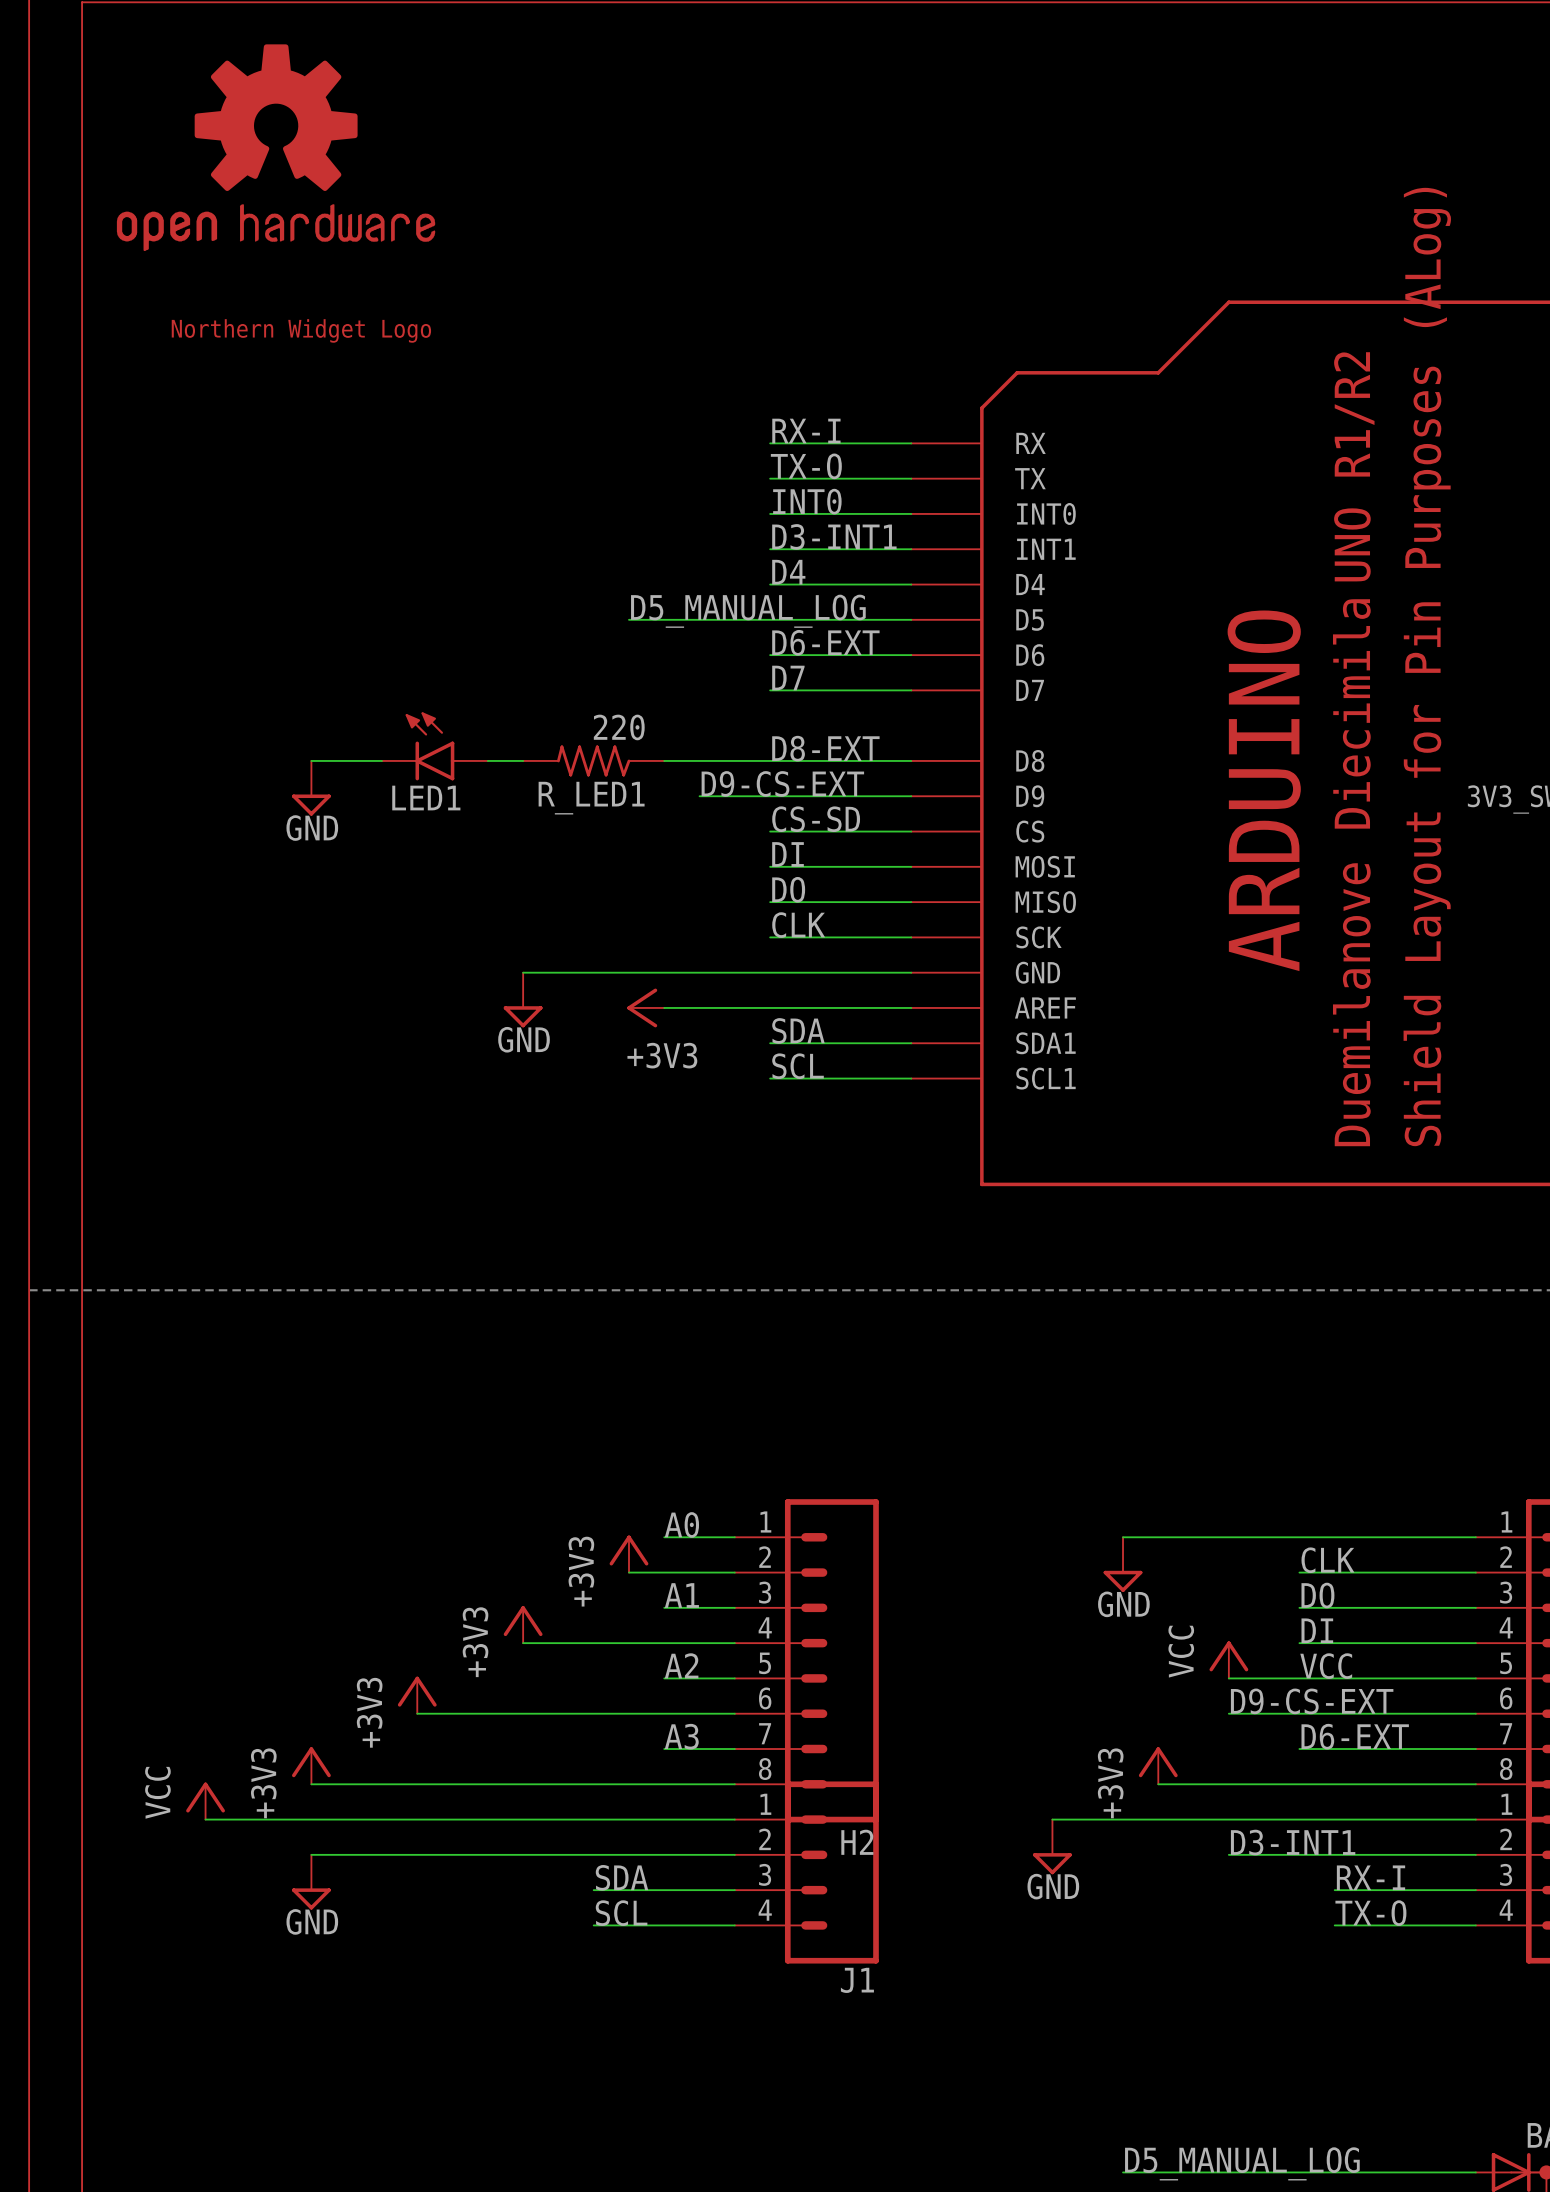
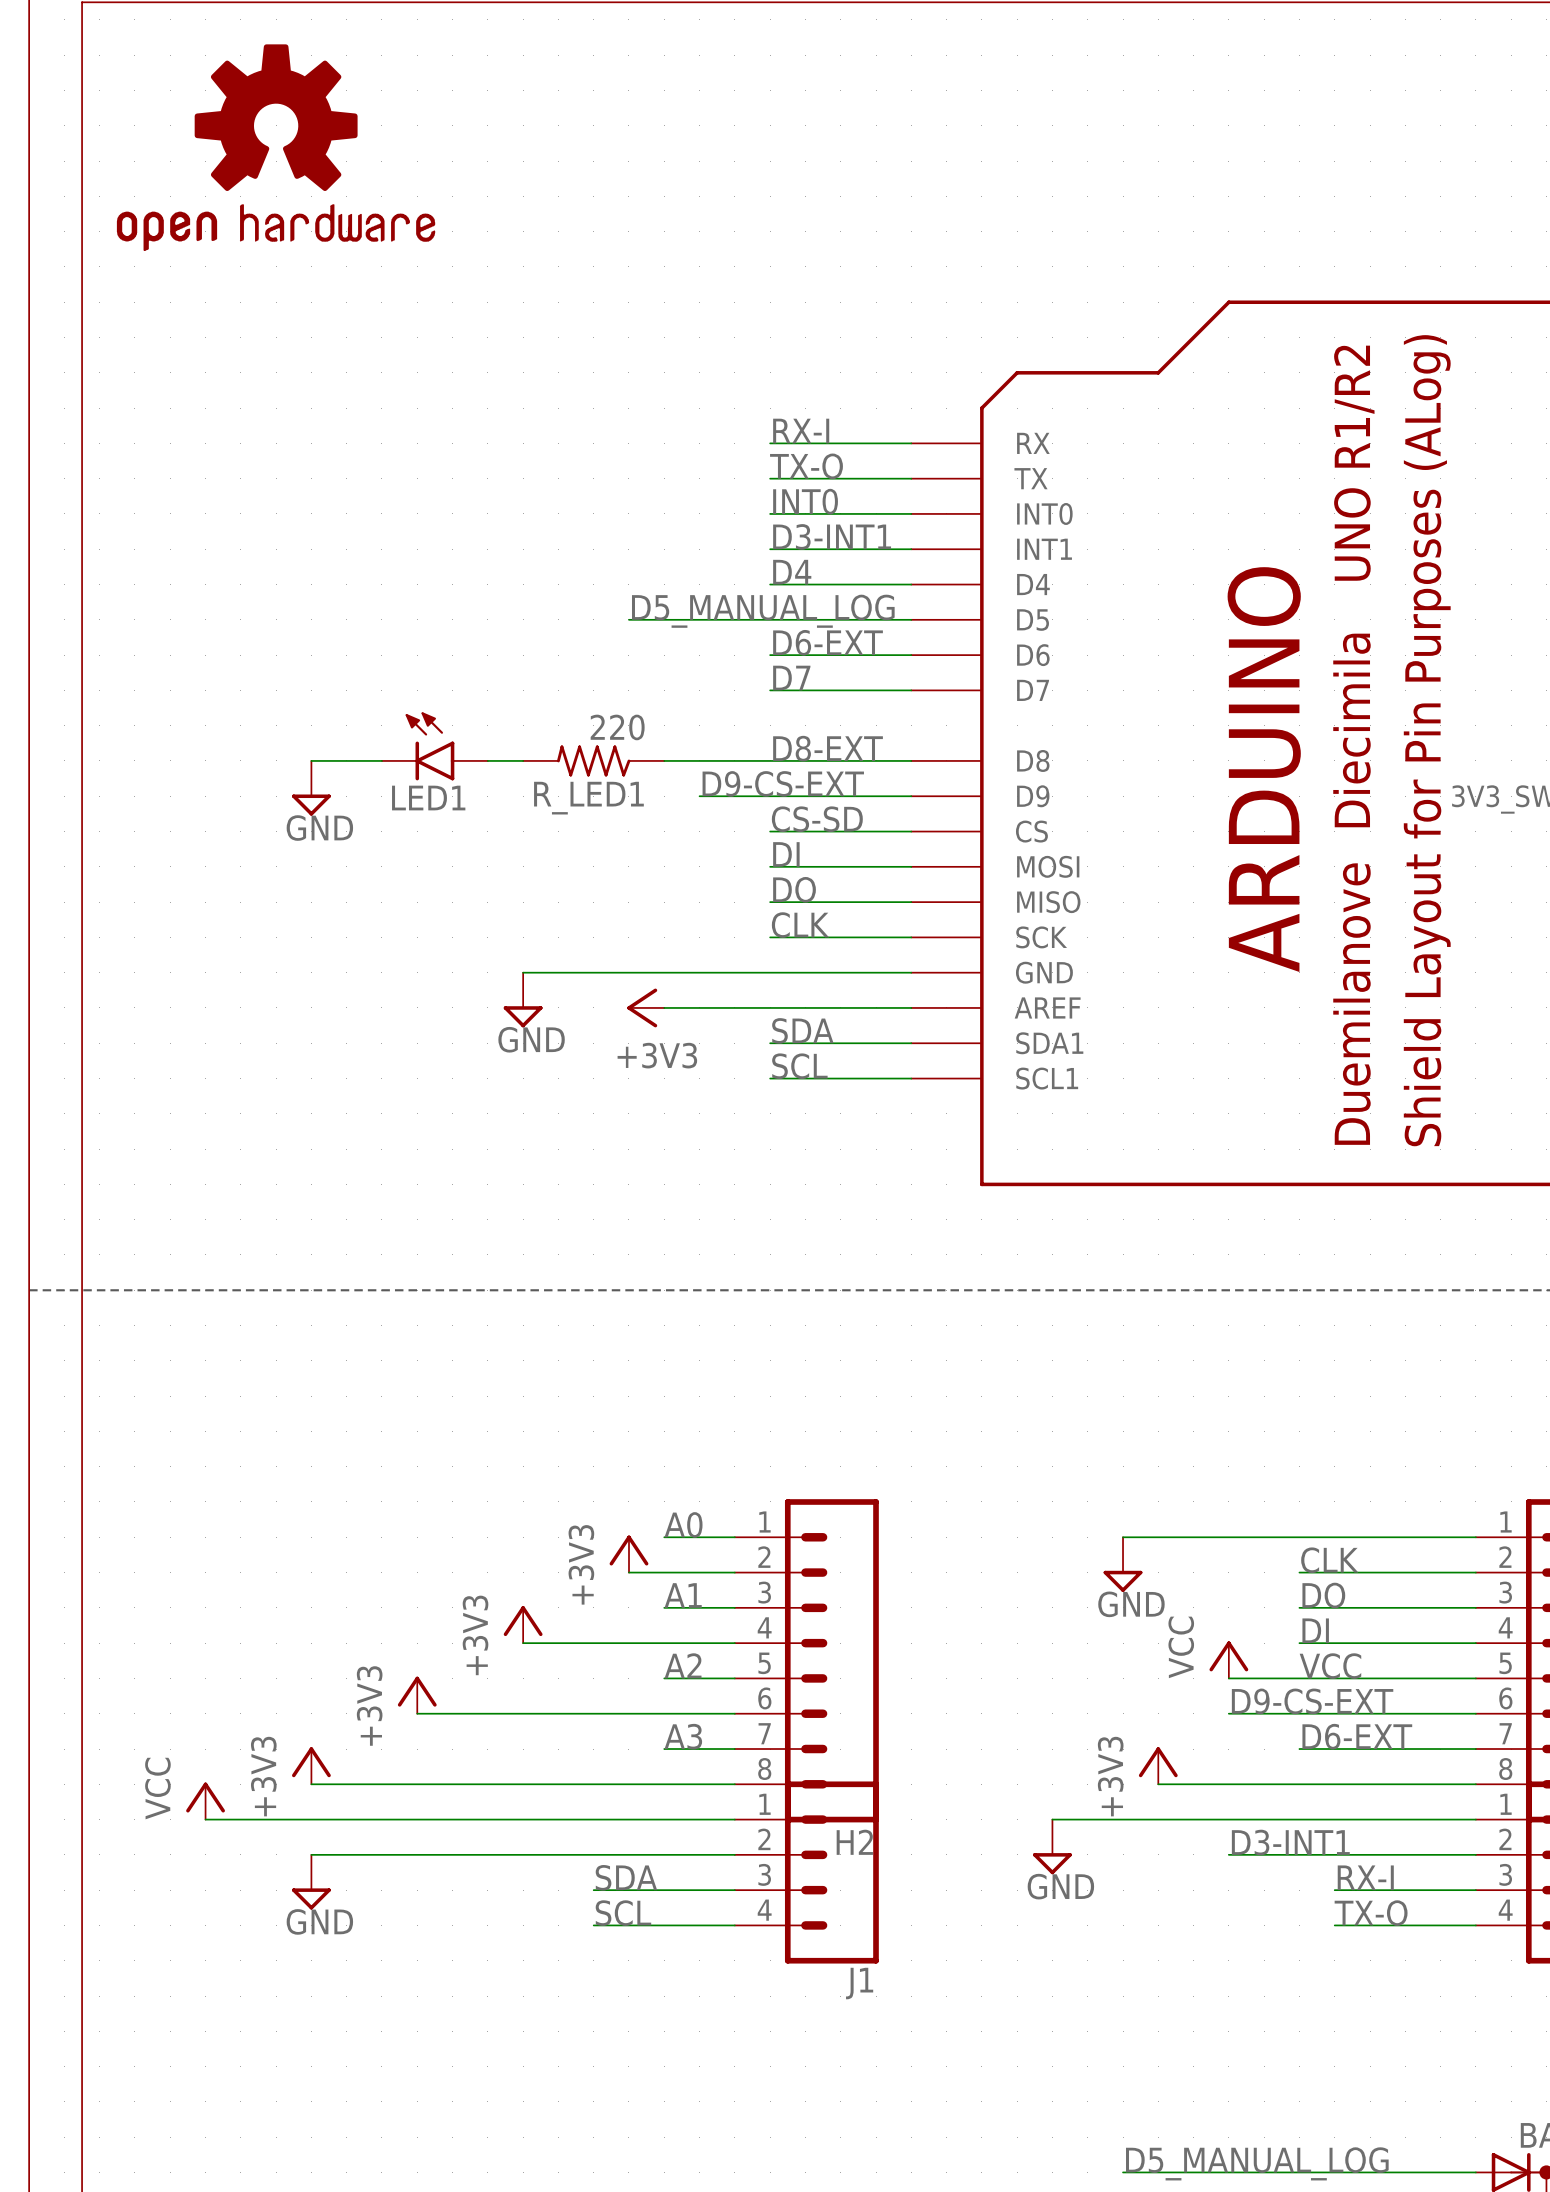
part: (301, 330) -> none

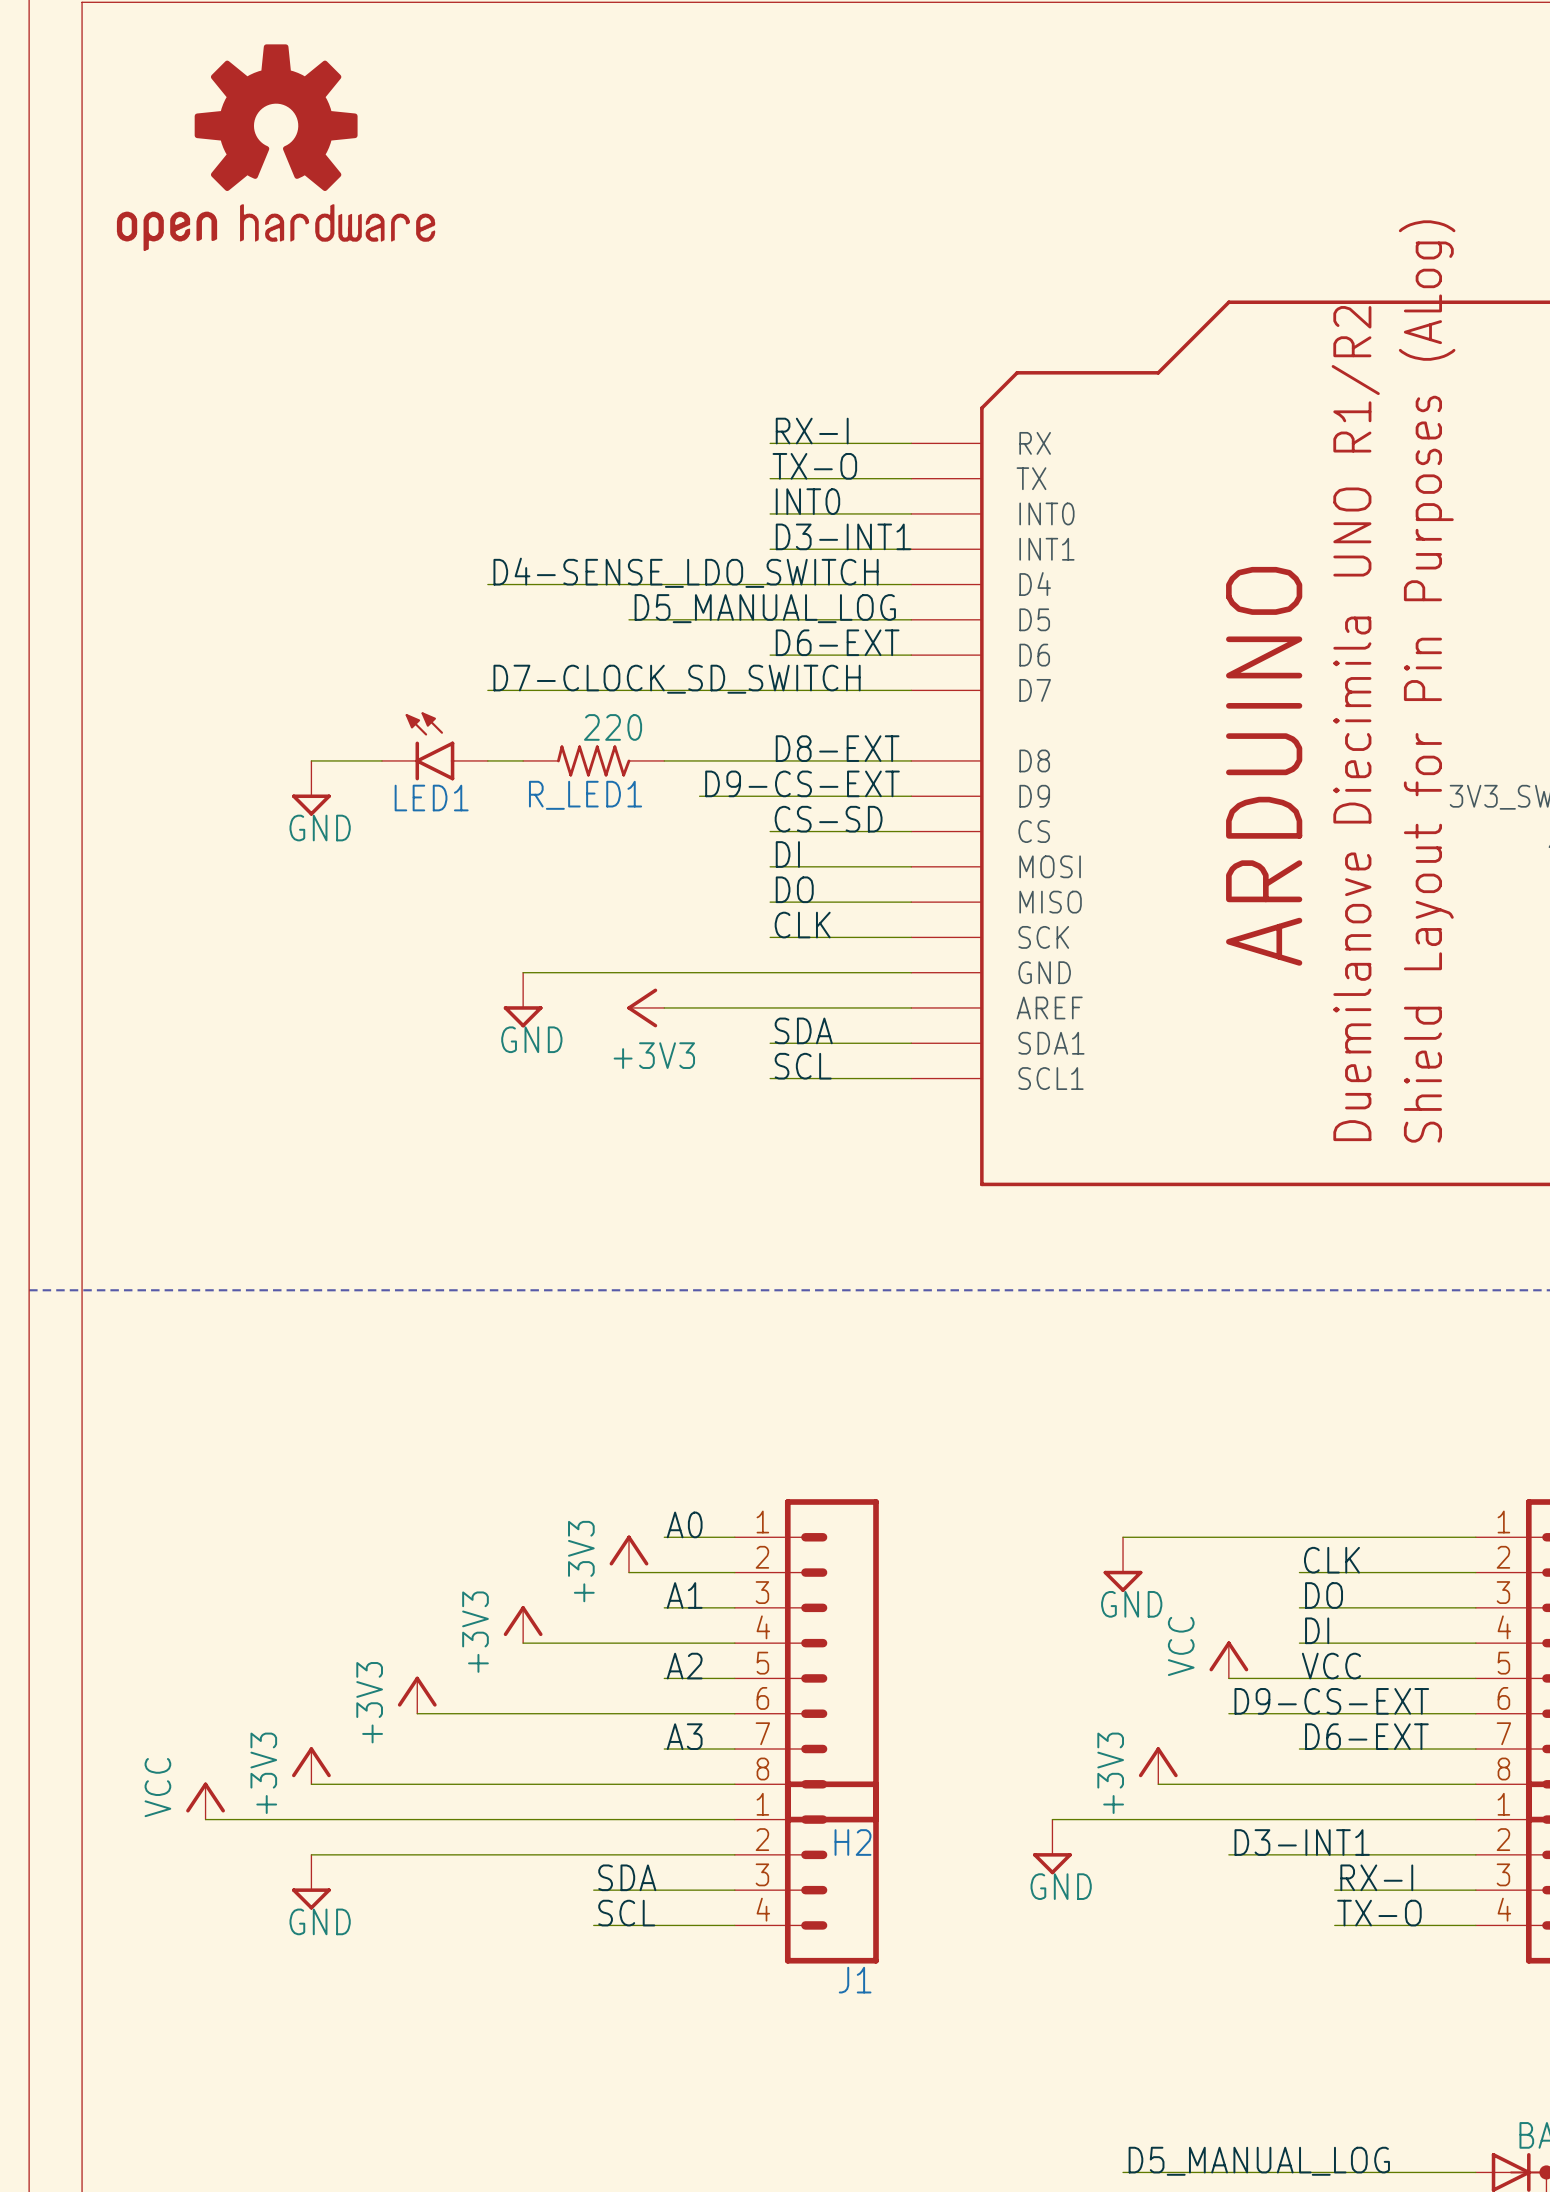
label: D4 (792, 572) -> none
label: none -> D4-SENSE_LDO_SWITCH (686, 572)
wire: none -> (487, 584) (770, 584)
label: D7 (791, 678) -> none
label: none -> D7-CLOCK_SD_SWITCH (677, 679)
wire: none -> (487, 690) (770, 690)

